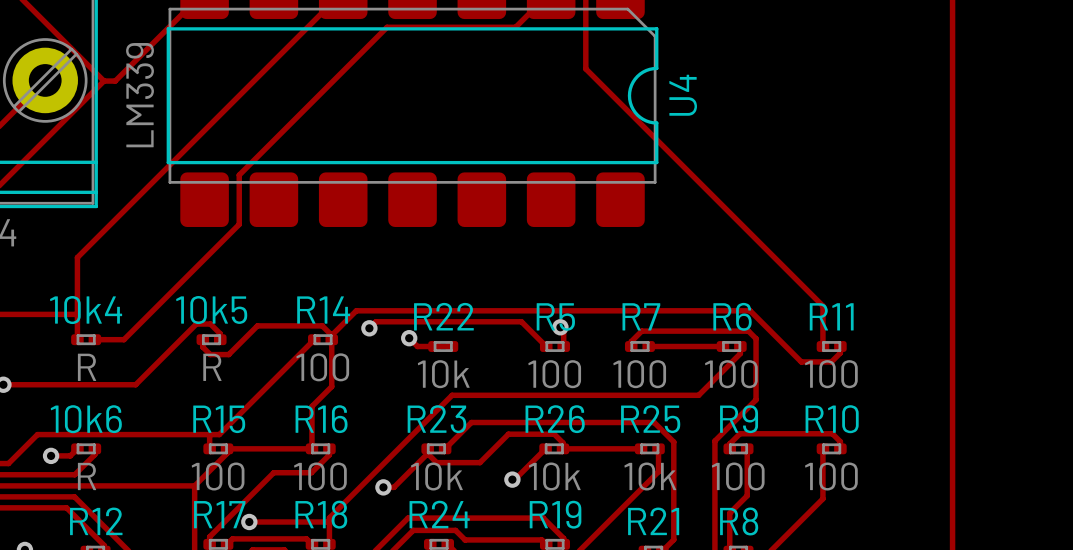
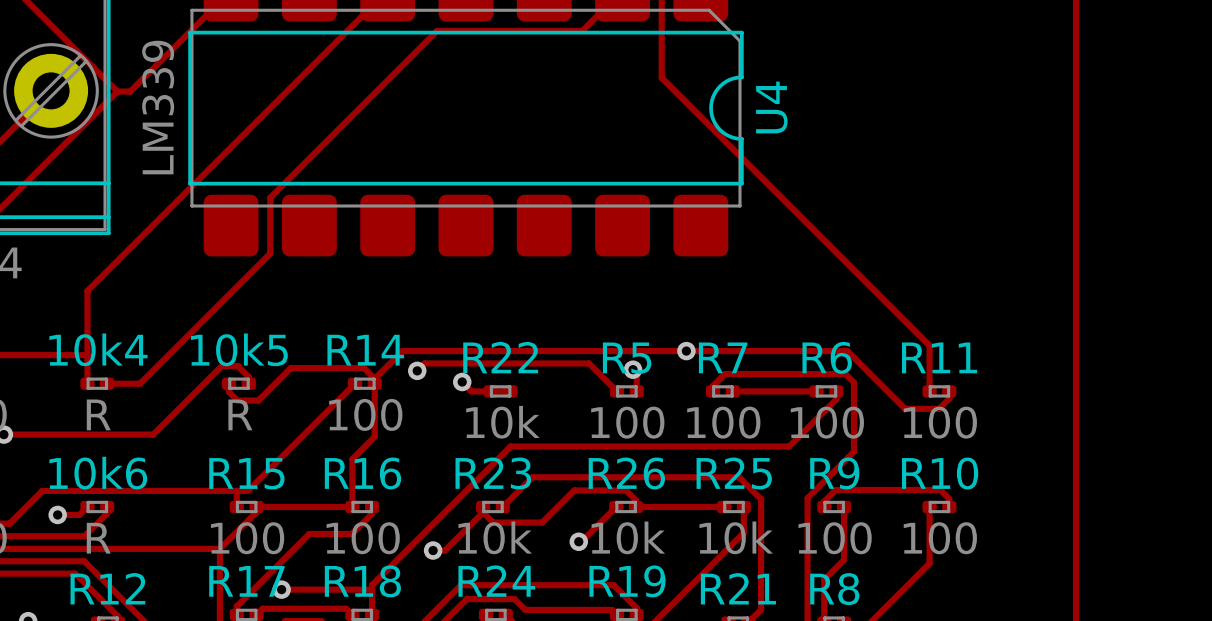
via: none -> (686, 351)

